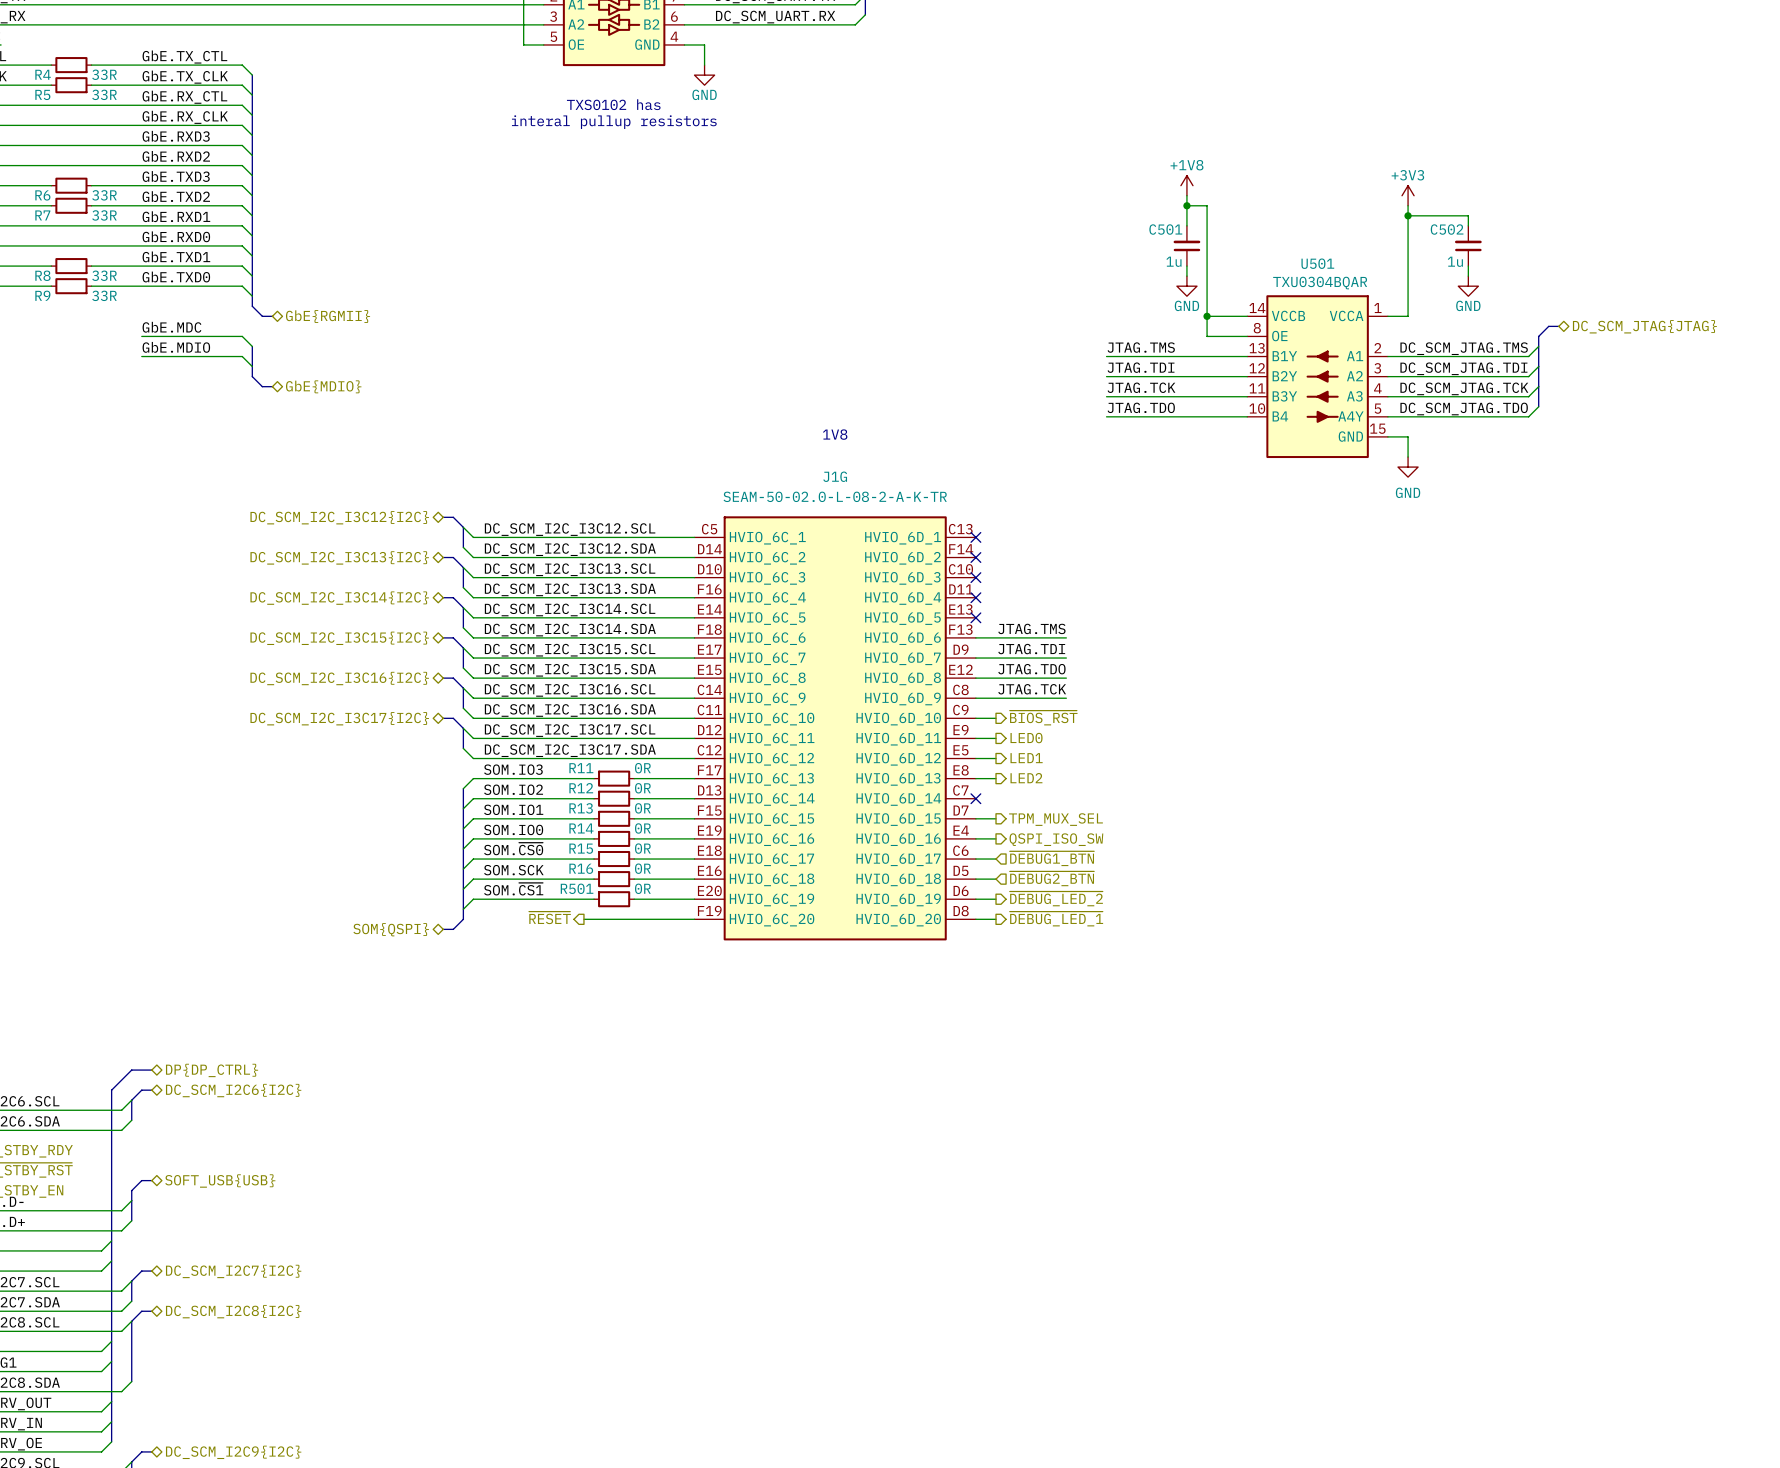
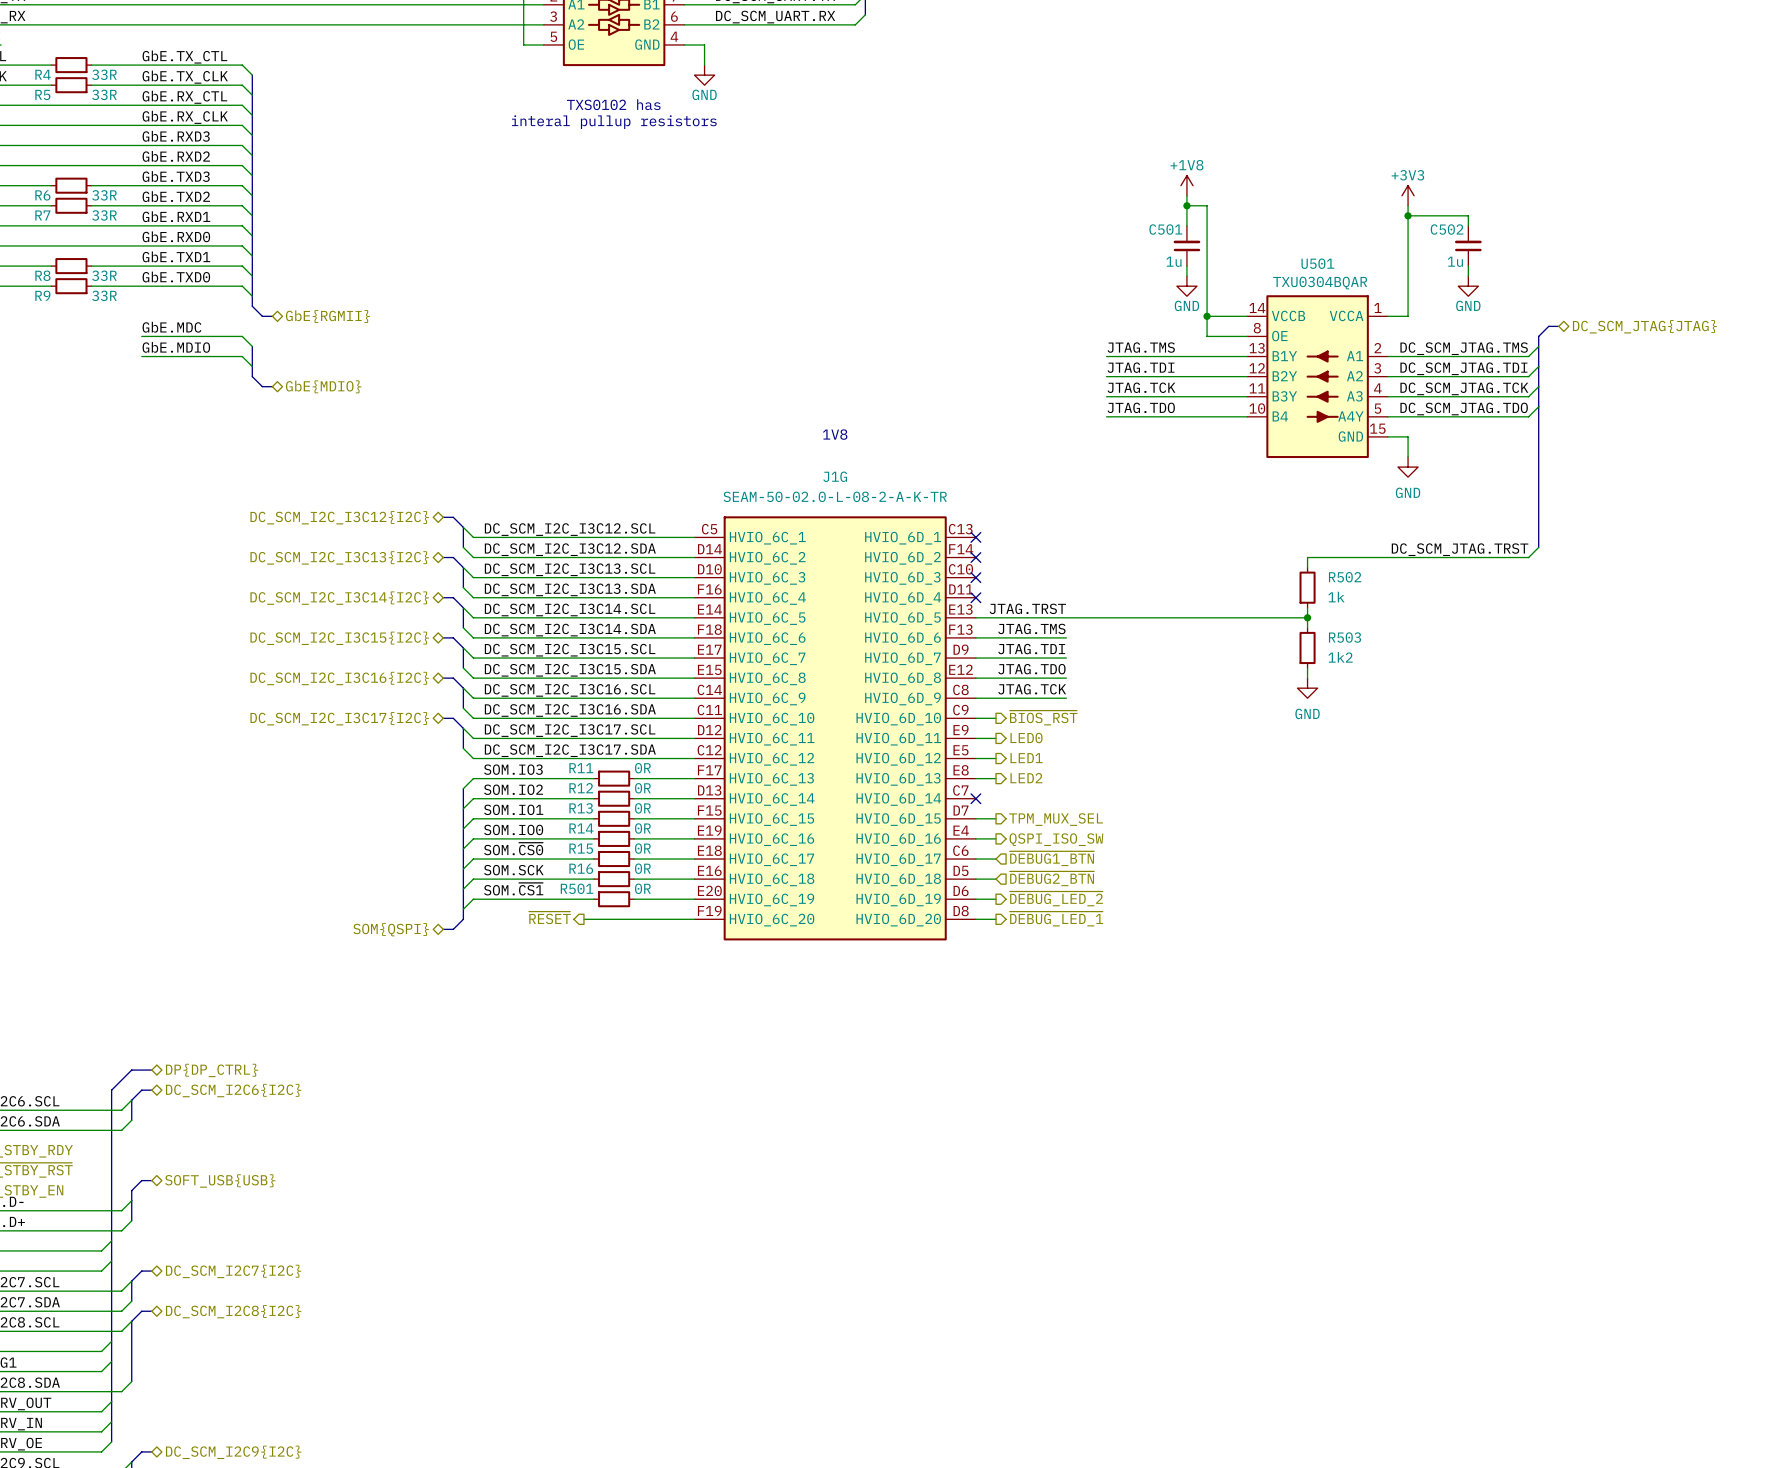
bus: none -> (1538, 406) (1538, 547)
wire: none -> (1538, 547) (1528, 557) (1307, 557) (1307, 567)
label: none -> DC_SCM_JTAG.TRST (1460, 549)
R502: none -> (1307, 587)
wire: none -> (1307, 607) (1307, 627)
label: none -> JTAG.TRST (1027, 608)
wire: none -> (975, 617) (1307, 617)
no-connect mark: (975, 617) -> none
junction: none -> (1307, 617)
R503: none -> (1307, 647)
wire: none -> (1307, 668) (1307, 678)
power symbol: none -> GND (1307, 688)

